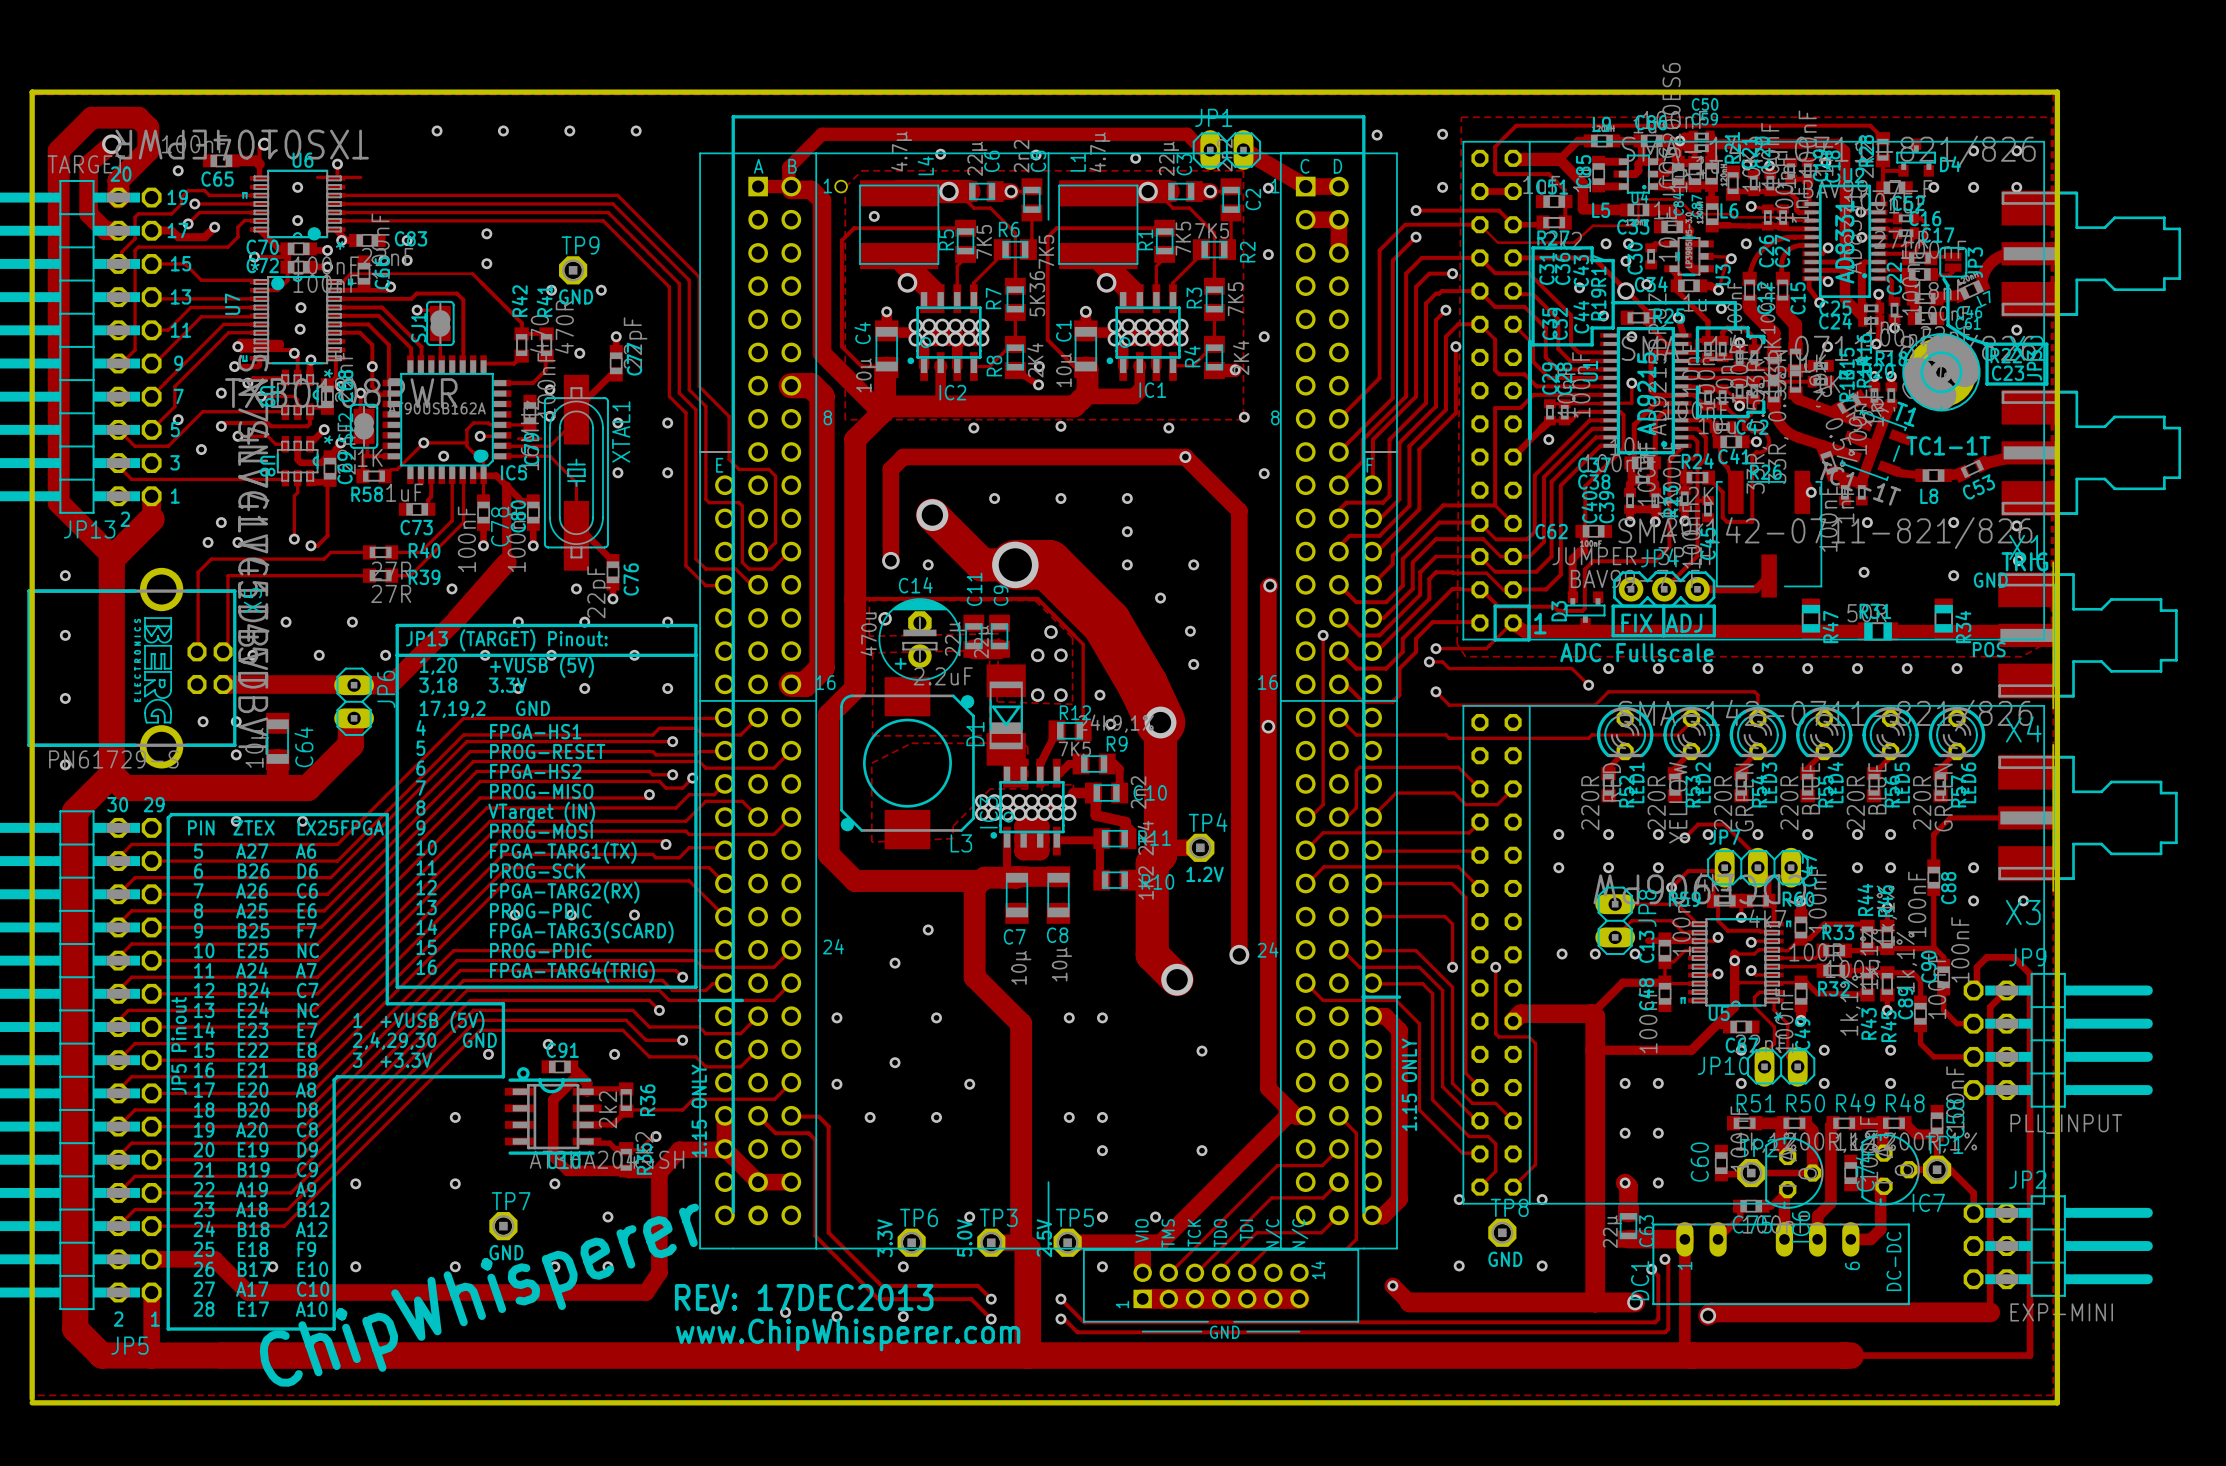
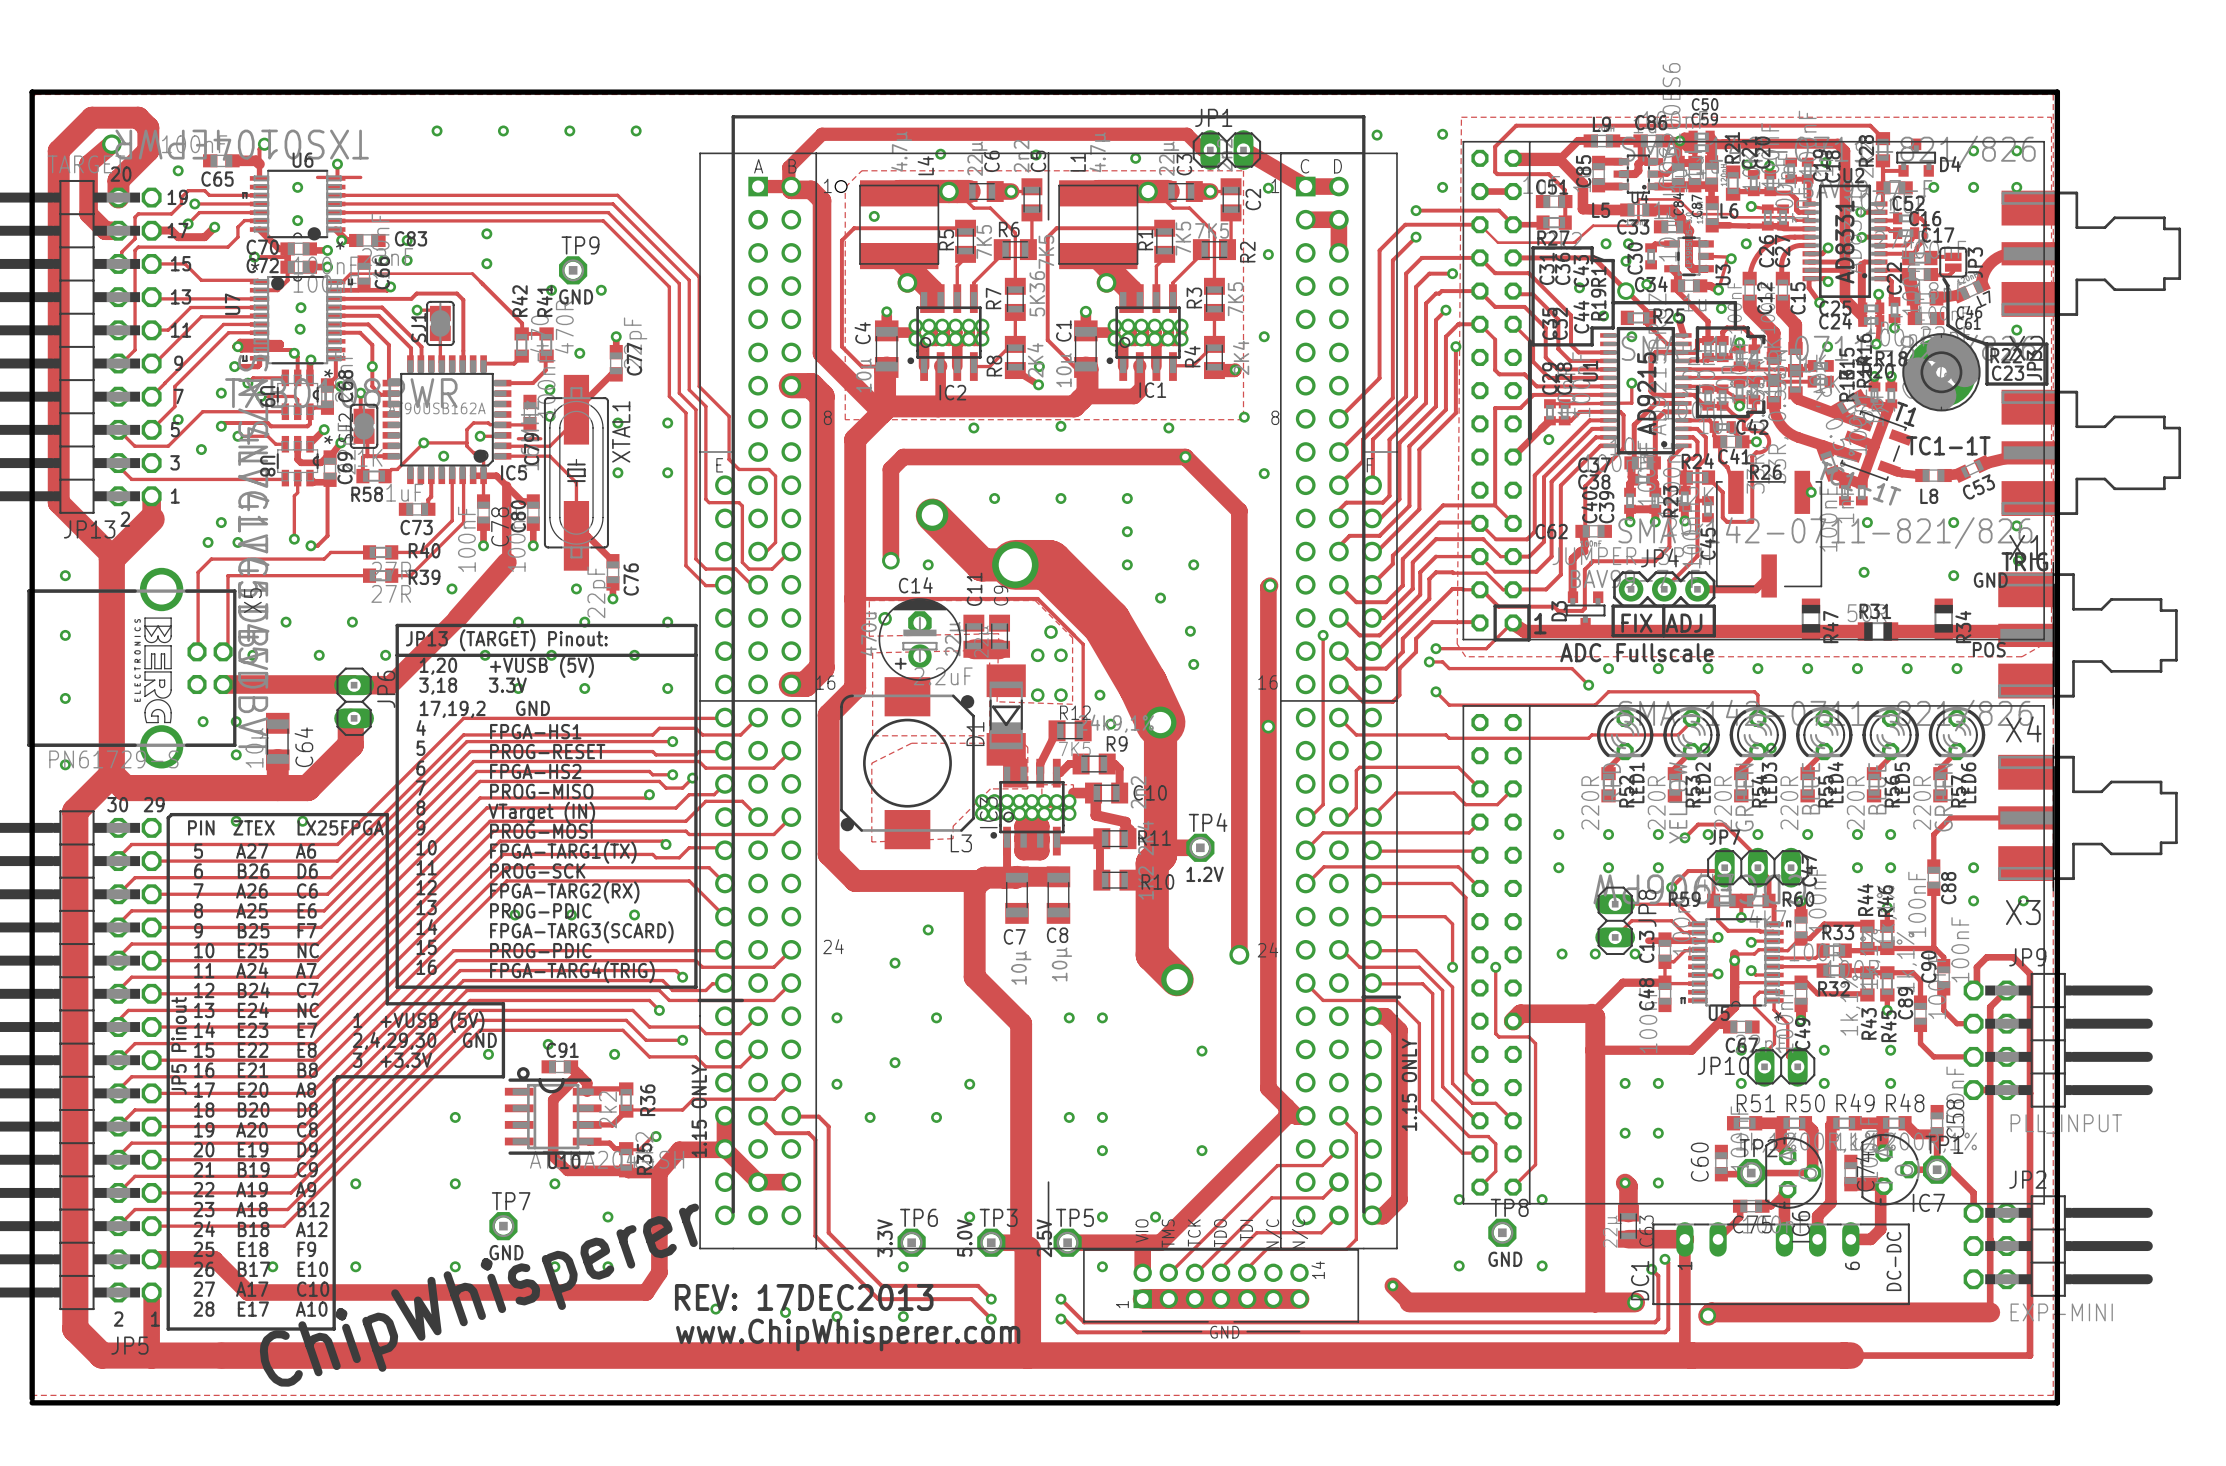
via: none -> (1704, 748)
via: none -> (1771, 748)

